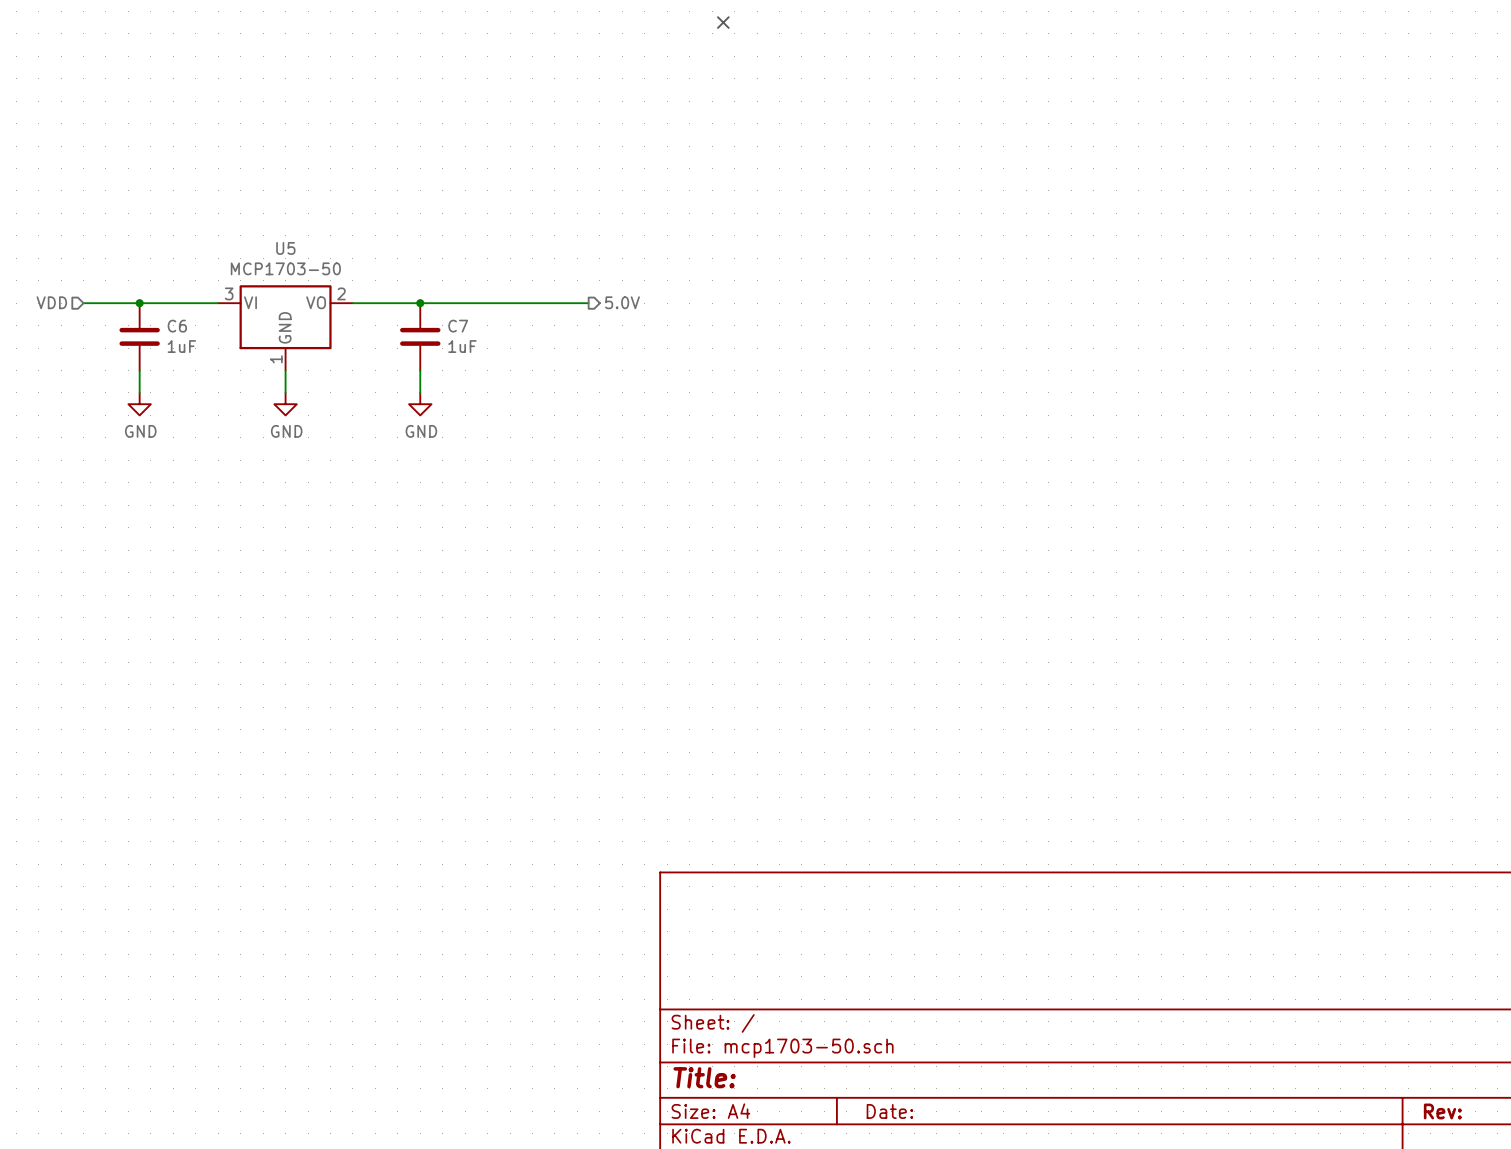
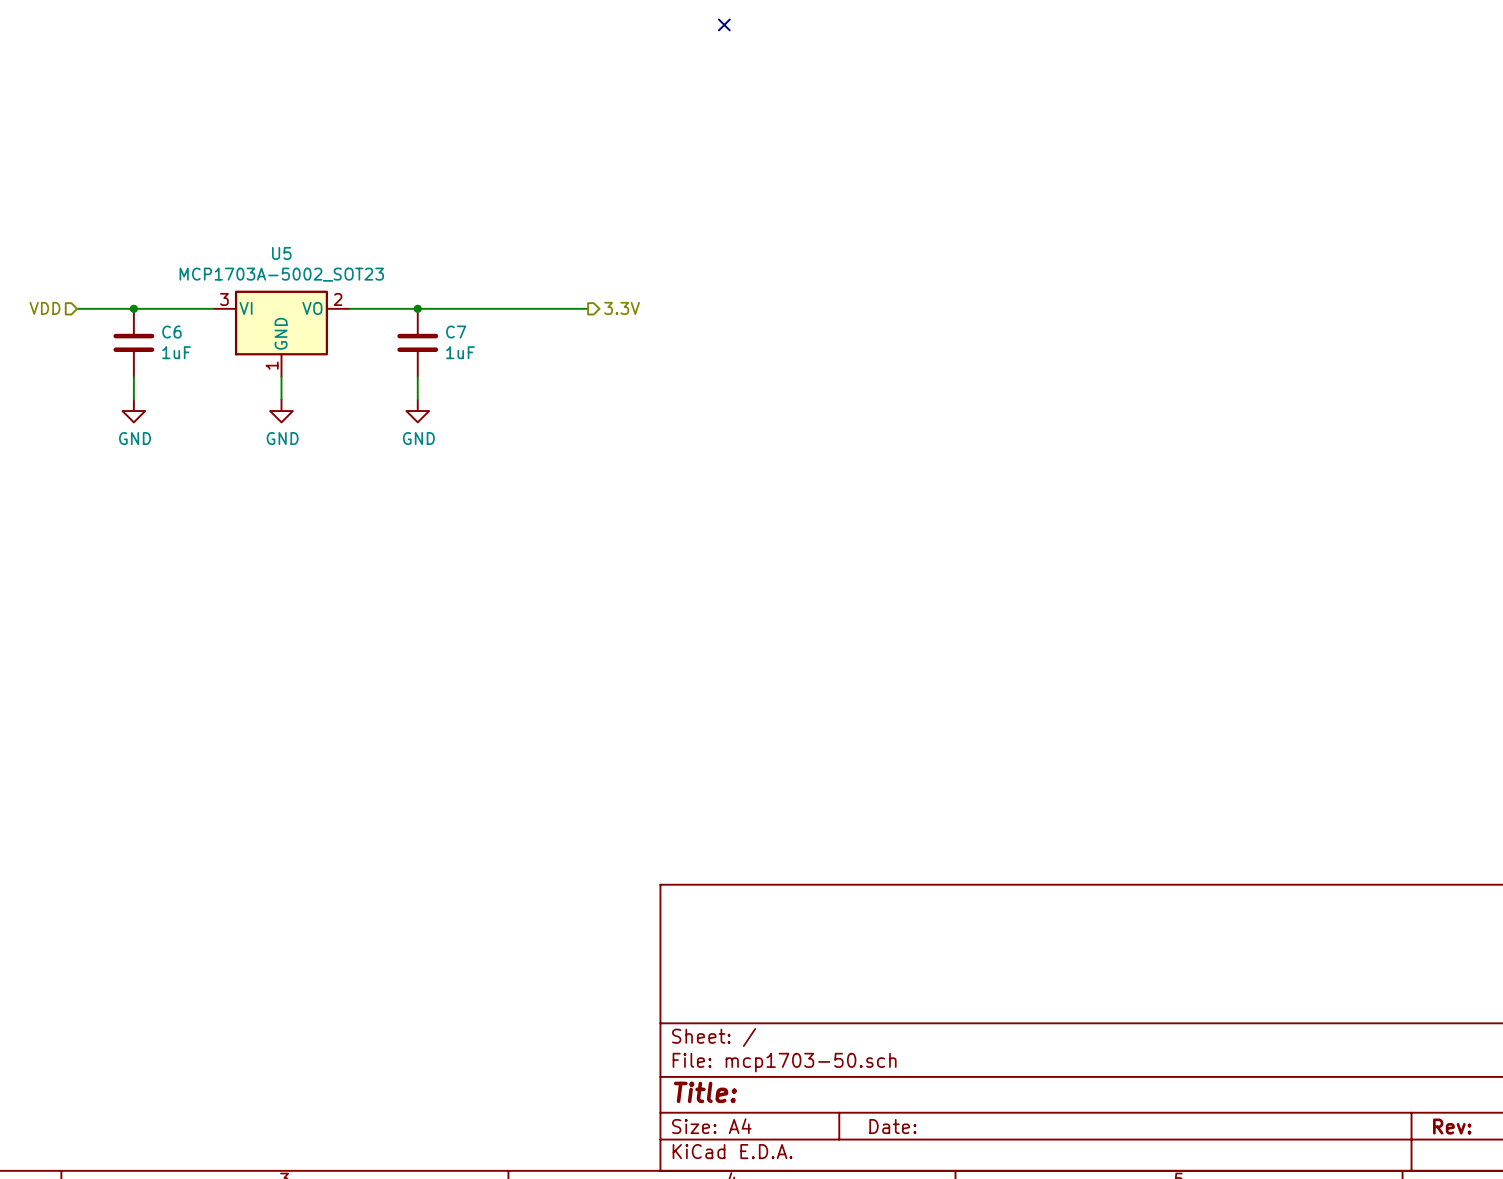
U5 value: MCP1703-50 (285, 268) -> MCP1703A-5002_SOT23 (281, 274)
hierarchical label: 5.0V (622, 302) -> 3.3V (622, 308)

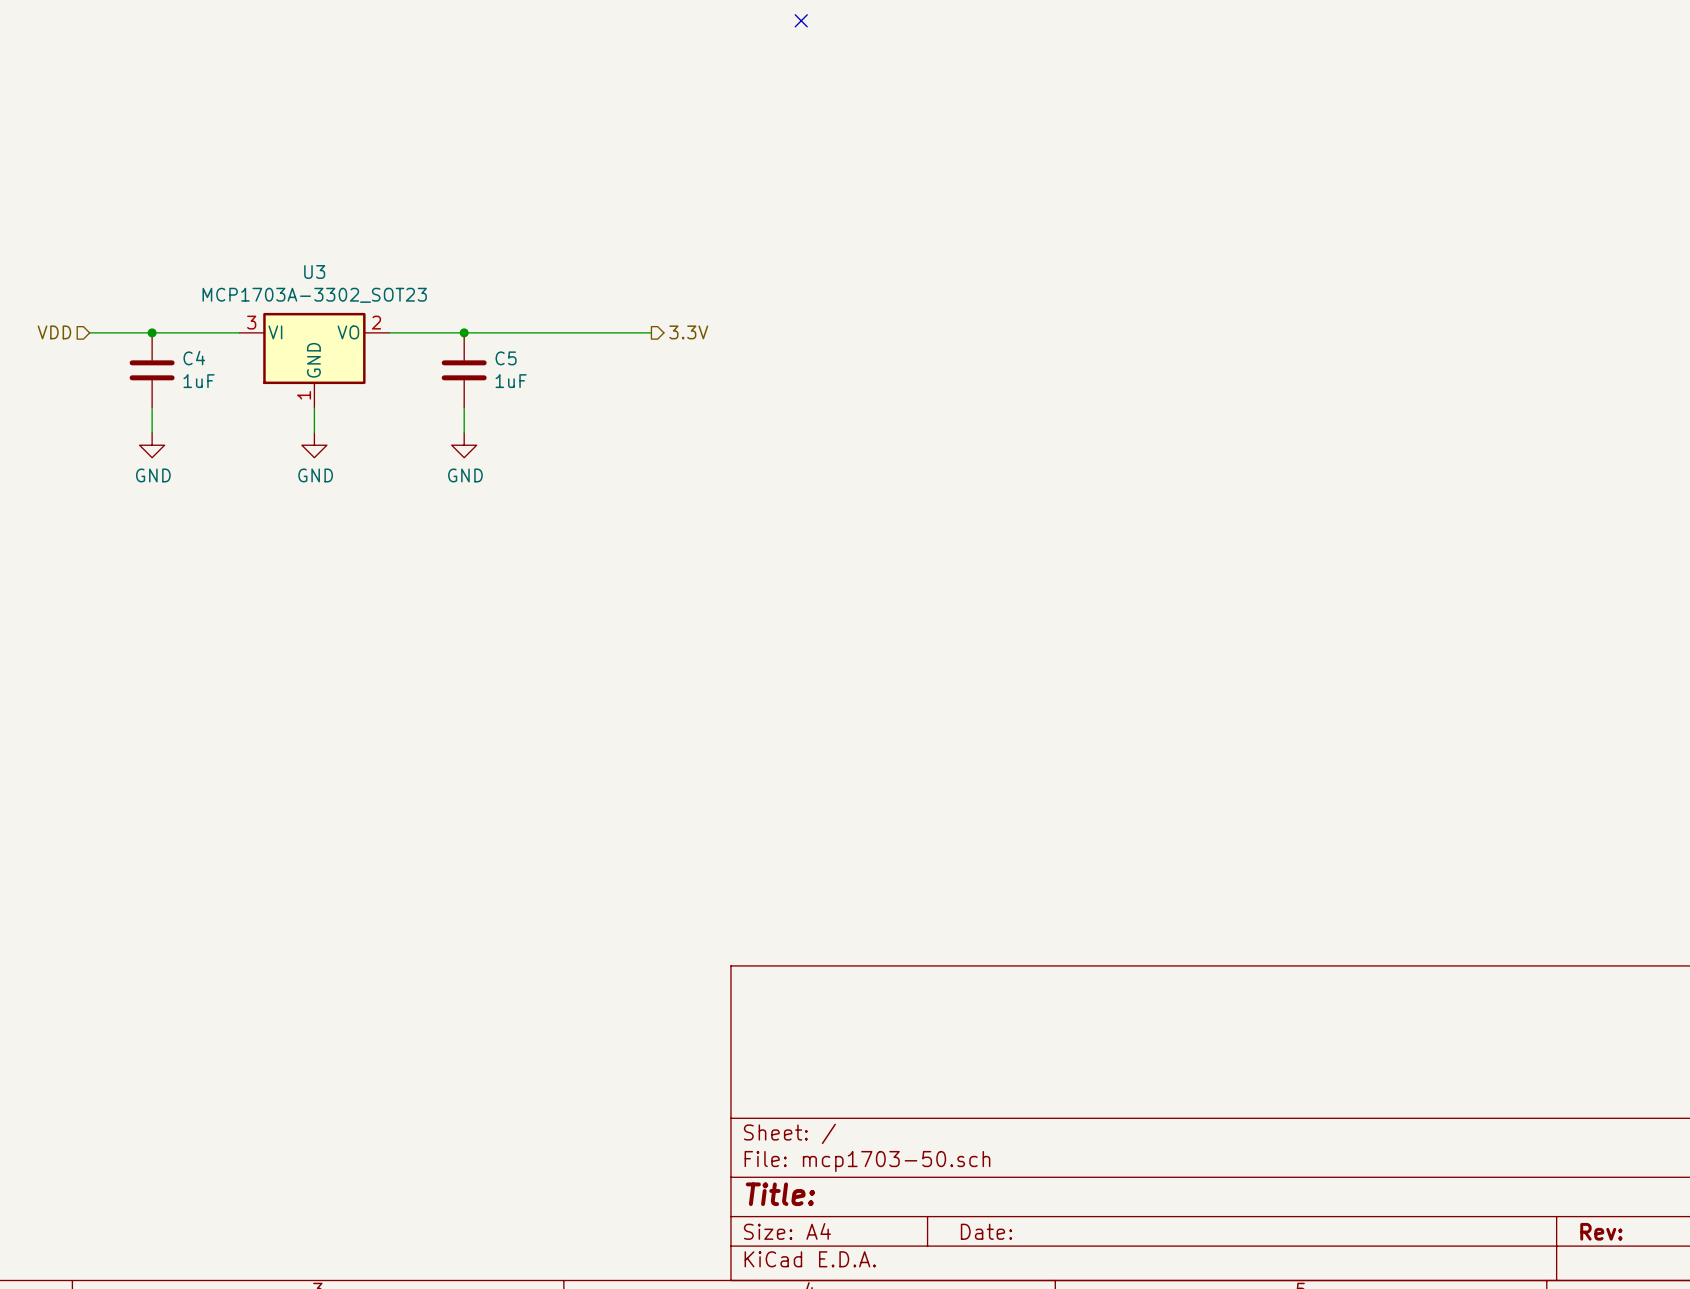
U5 name: U5 (281, 253) -> U3 (314, 272)
U5 value: MCP1703A-5002_SOT23 (281, 274) -> MCP1703A-3302_SOT23 (314, 295)
C6 name: C6 (171, 332) -> C4 (194, 358)
C7 name: C7 (456, 332) -> C5 (506, 358)

